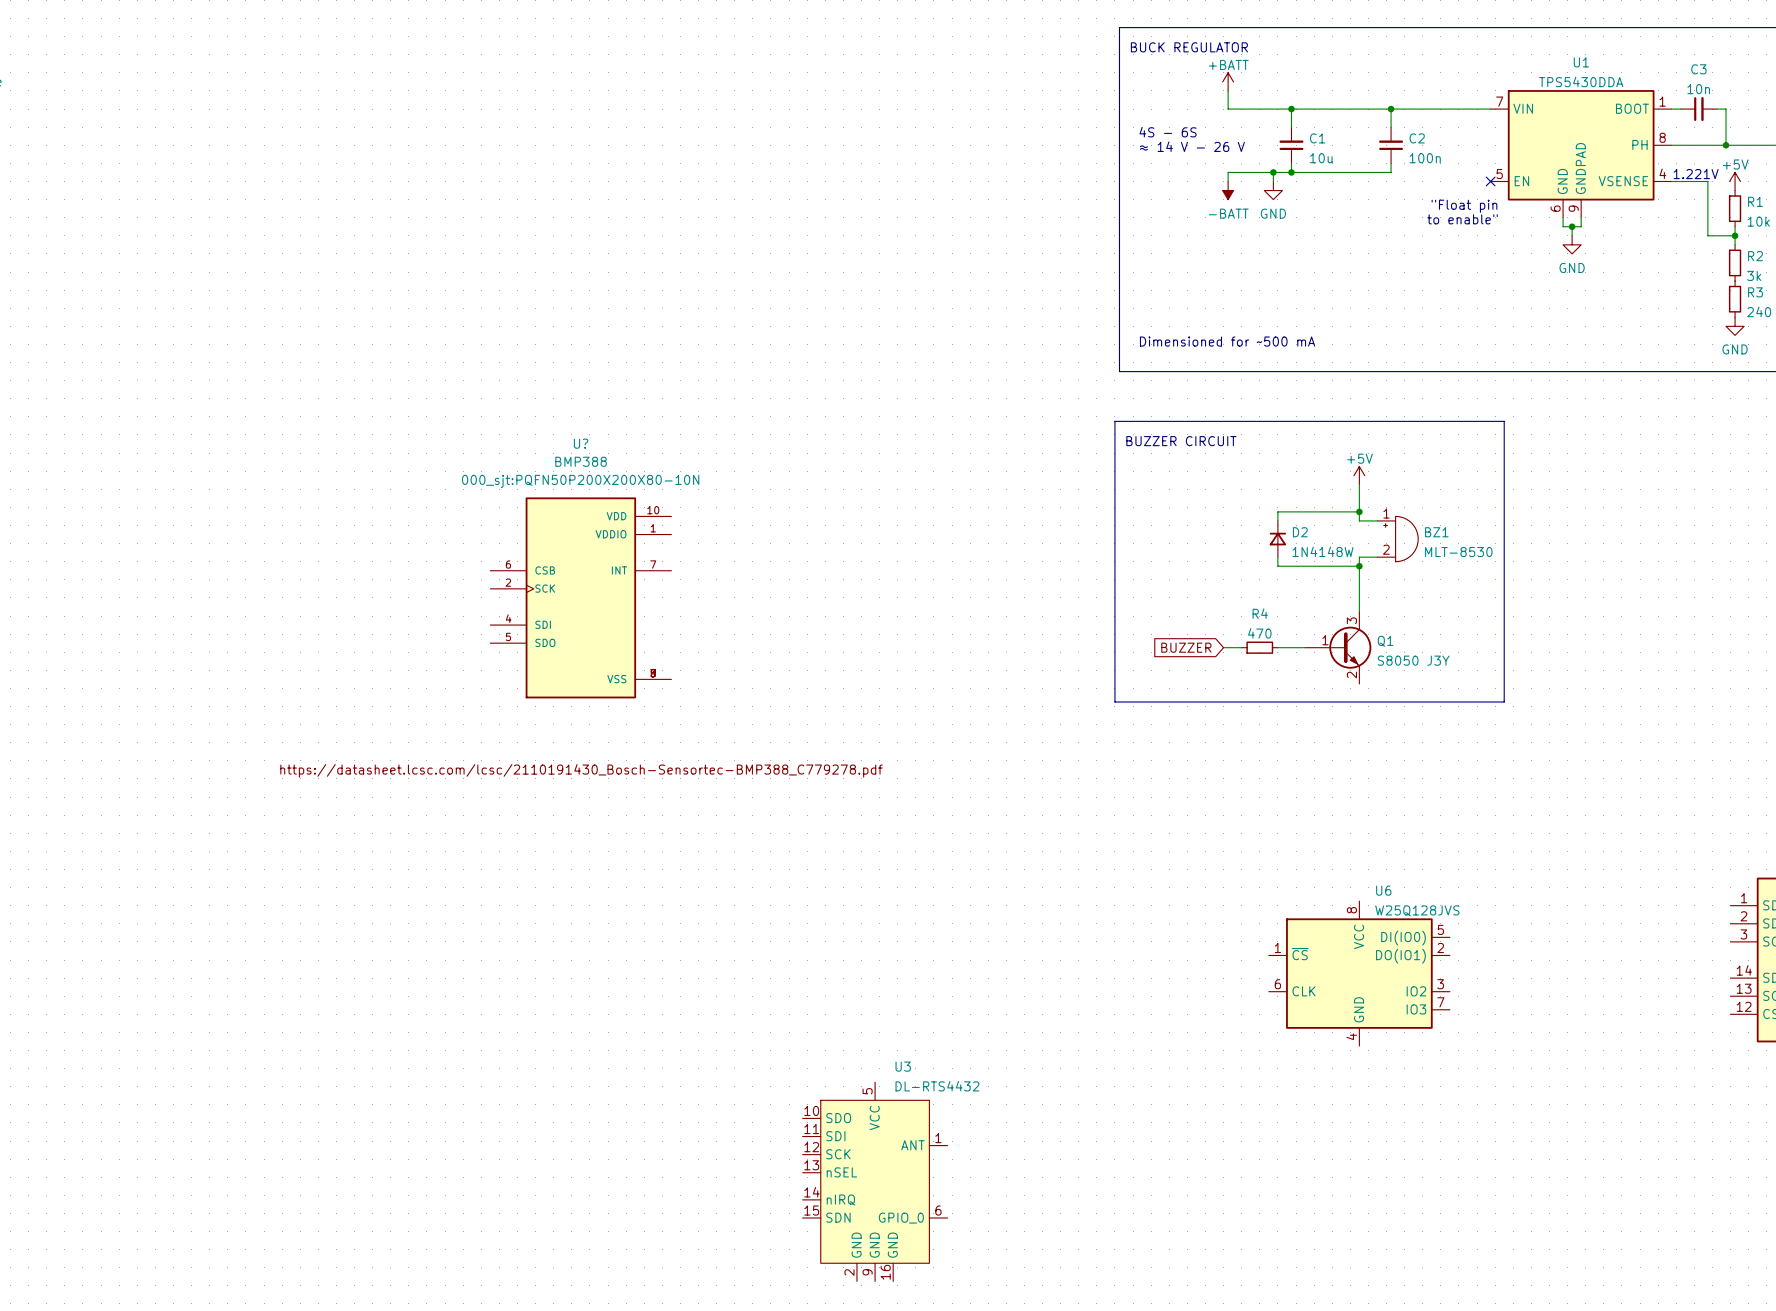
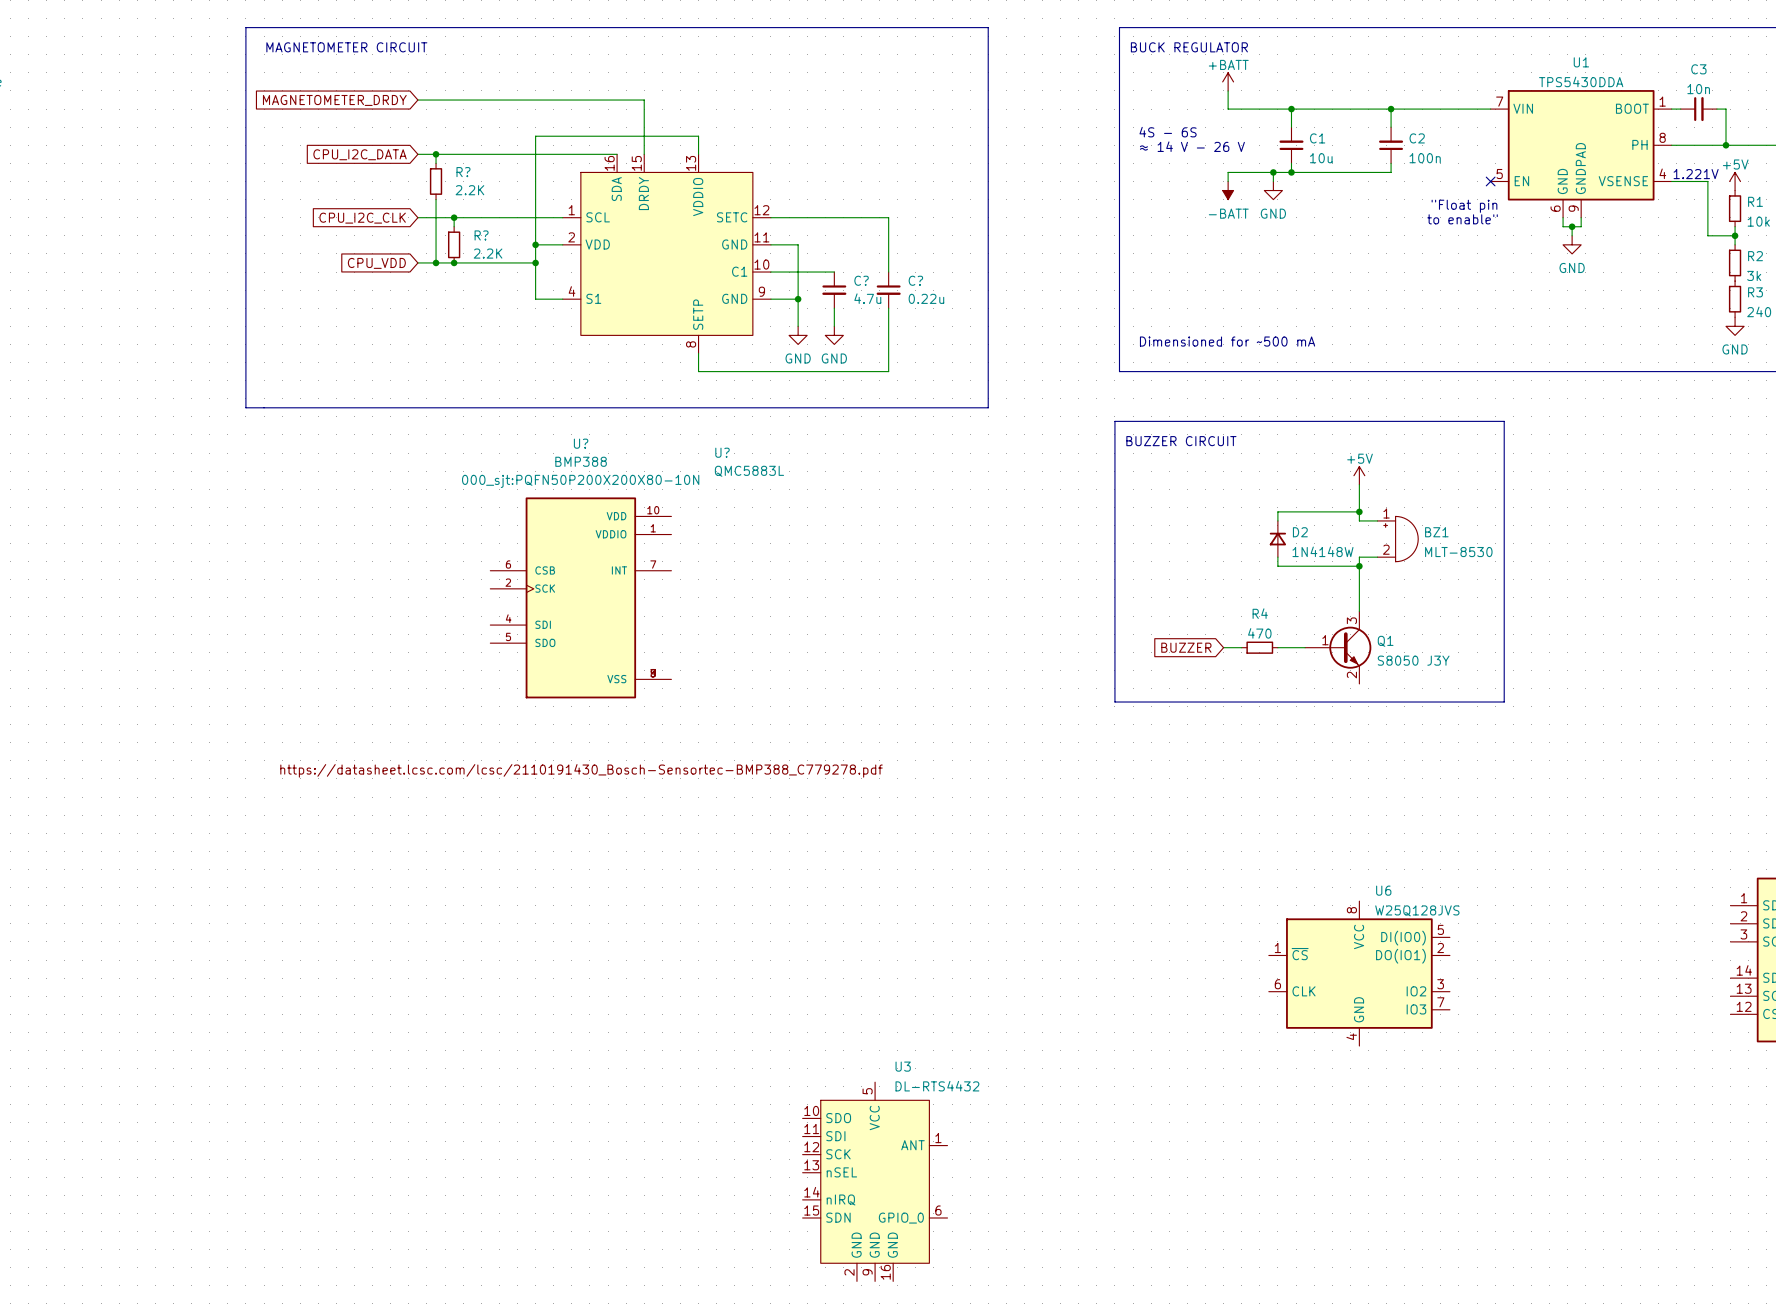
line: none -> (245, 27) (988, 27) (988, 407) (245, 407) (245, 27)
text: none -> MAGNETOMETER CIRCUIT (346, 47)
global label: none -> MAGNETOMETER_DRDY (334, 100)
wire: none -> (417, 100) (644, 100) (644, 154)
global label: none -> CPU_I2C_DATA (360, 154)
wire: none -> (417, 154) (617, 154)
wire: none -> (436, 154) (436, 163)
junction: none -> (436, 154)
wire: none -> (698, 154) (698, 136) (535, 136) (535, 299) (562, 299)
R?: none -> 2.2K (436, 181)
wire: none -> (436, 199) (436, 262)
wire: none -> (417, 217) (562, 217)
wire: none -> (454, 217) (454, 226)
junction: none -> (454, 217)
wire: none -> (770, 217) (888, 217) (888, 272)
global label: none -> CPU_I2C_CLK (362, 218)
R?: none -> 2.2K (454, 244)
wire: none -> (535, 244) (562, 244)
junction: none -> (535, 244)
wire: none -> (770, 244) (798, 244) (798, 326)
U?: none -> QMC5883L (666, 253)
wire: none -> (417, 262) (535, 262)
junction: none -> (436, 262)
junction: none -> (454, 262)
junction: none -> (535, 262)
global label: none -> CPU_VDD (376, 263)
wire: none -> (770, 272) (834, 272)
C?: none -> 4.7u (834, 290)
C?: none -> 0.22u (888, 290)
wire: none -> (770, 299) (798, 299)
junction: none -> (798, 299)
wire: none -> (834, 308) (834, 326)
wire: none -> (888, 308) (888, 371) (698, 371) (698, 353)
power symbol: none -> GND (798, 335)
power symbol: none -> GND (834, 335)

